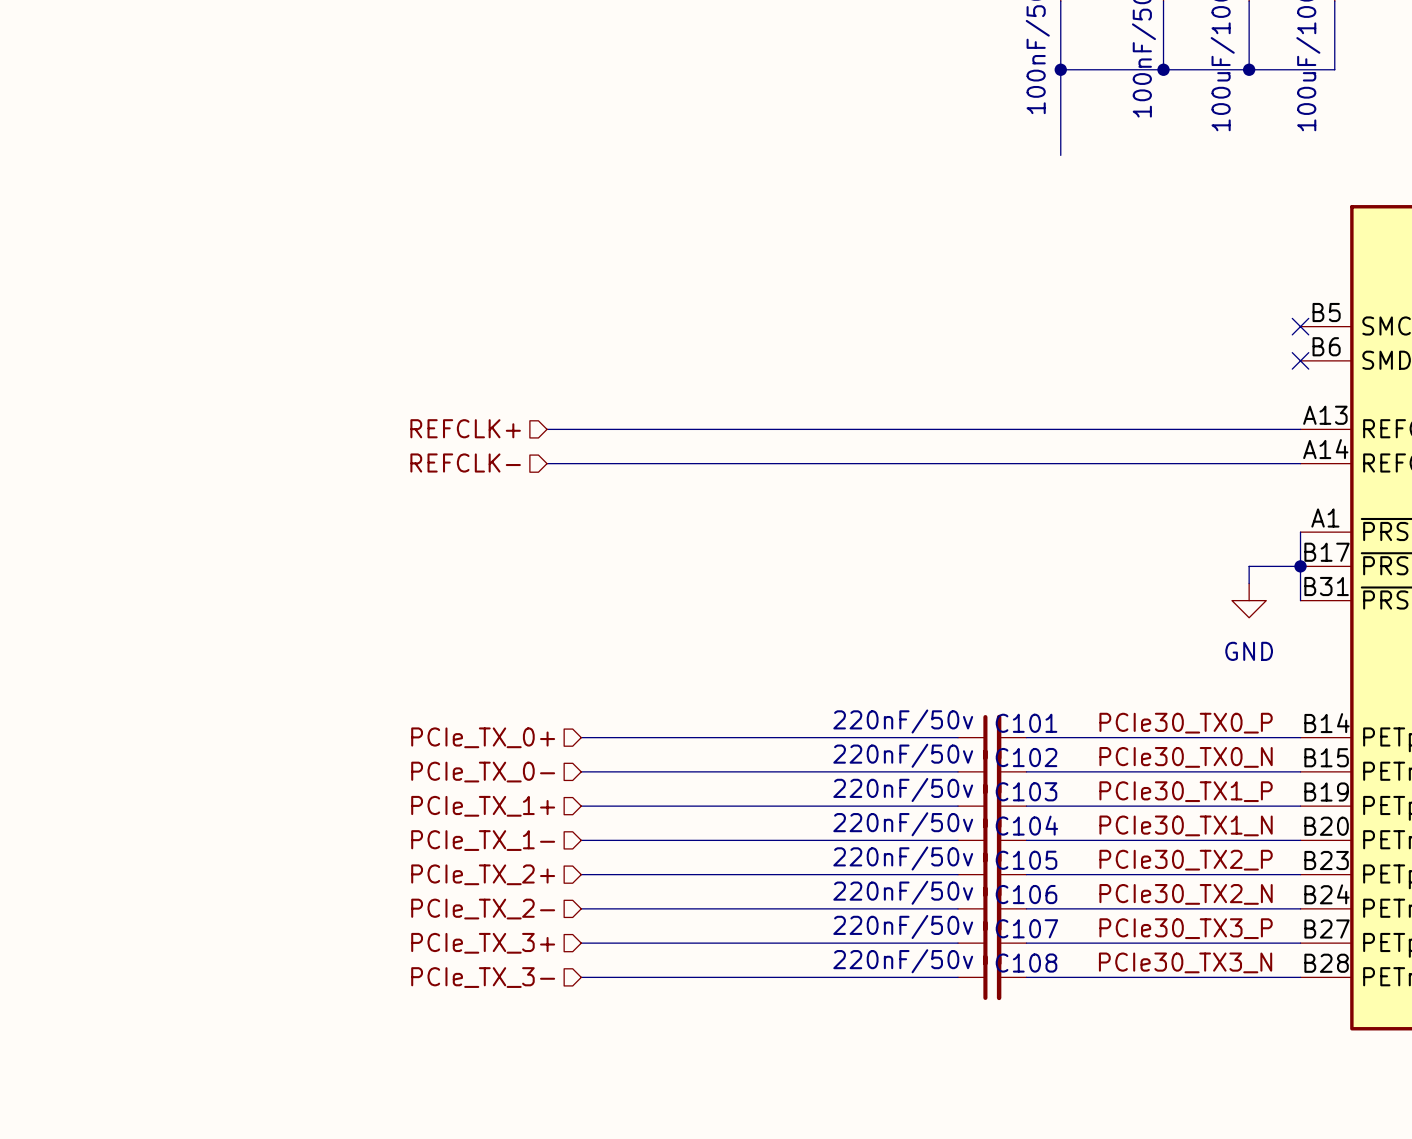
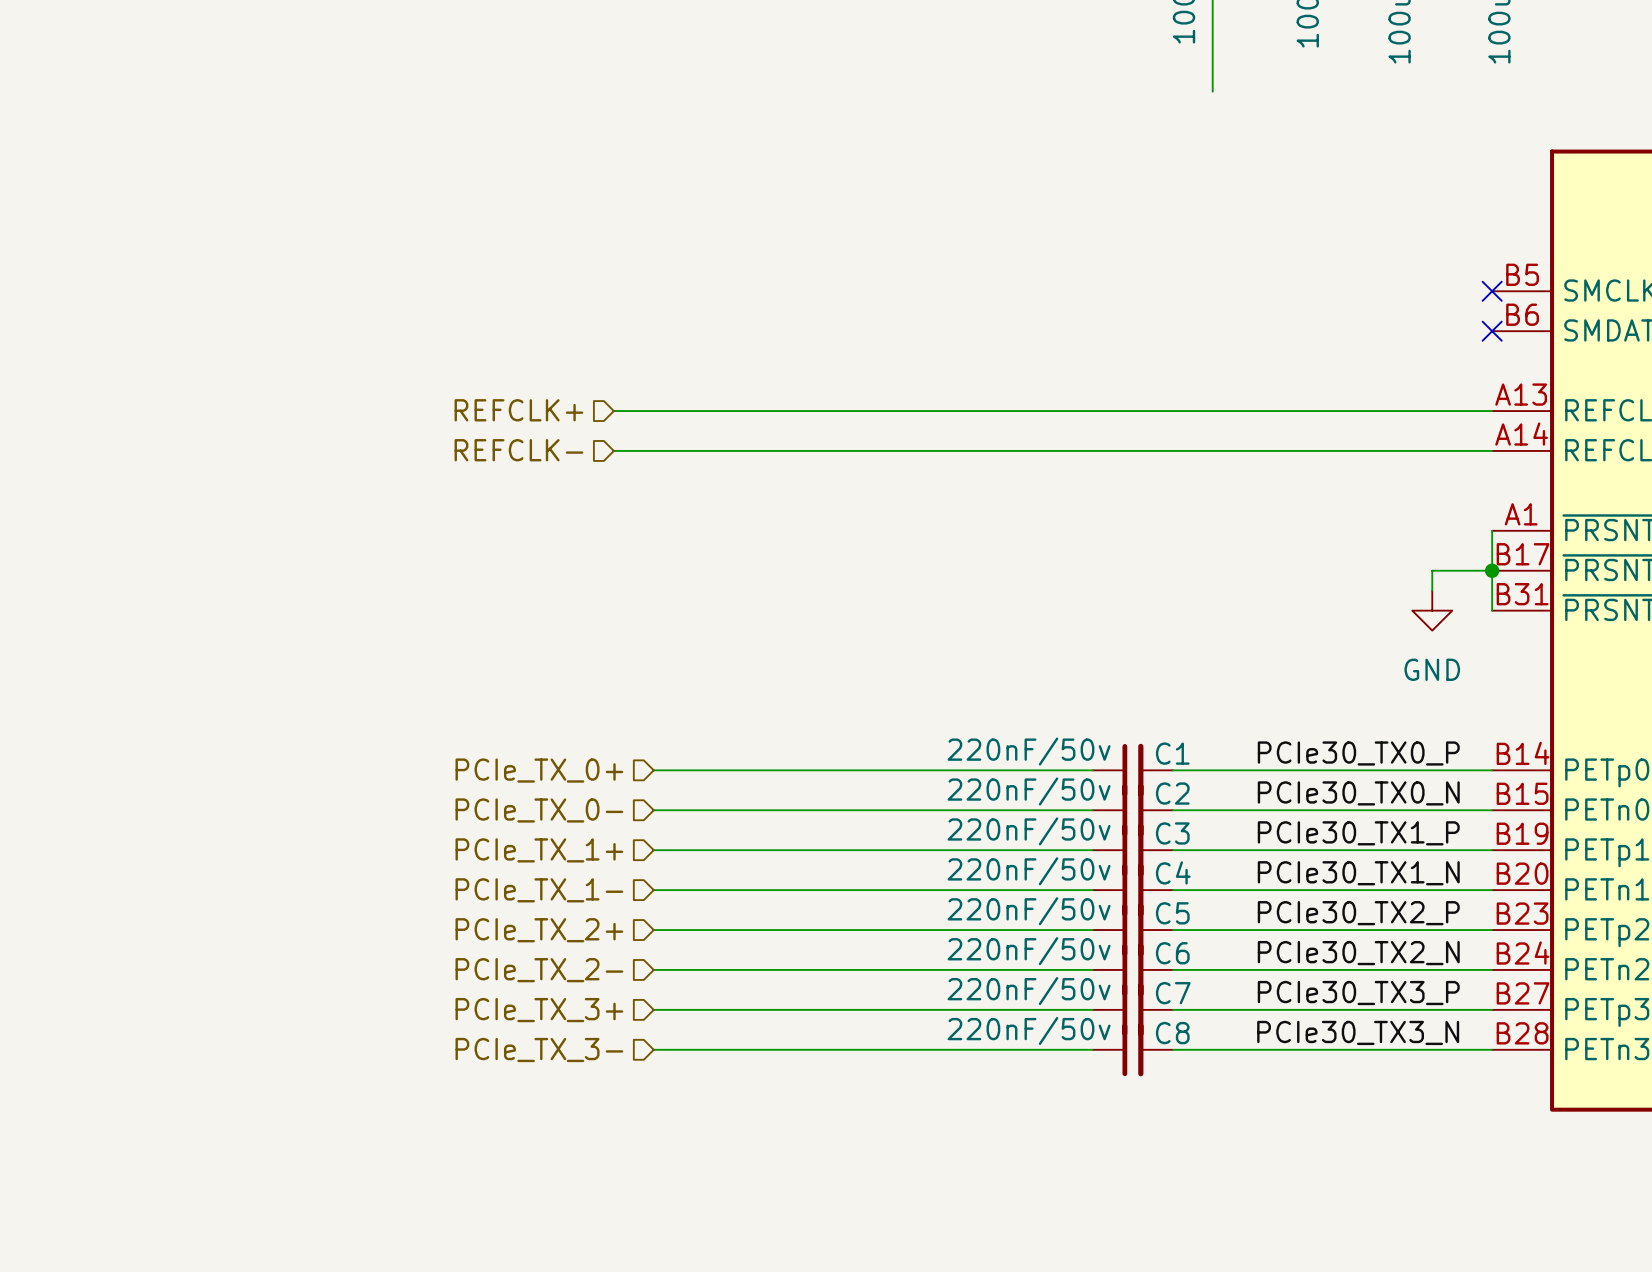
C101 name: C101 (1026, 723) -> C1 (1172, 753)
C102 name: C102 (1026, 757) -> C2 (1172, 793)
C103 name: C103 (1026, 791) -> C3 (1172, 833)
C104 name: C104 (1026, 825) -> C4 (1173, 872)
C105 name: C105 (1026, 860) -> C5 (1172, 913)
C106 name: C106 (1026, 894) -> C6 (1172, 953)
C107 name: C107 (1026, 928) -> C7 (1173, 993)
C108 name: C108 (1026, 963) -> C8 (1172, 1033)

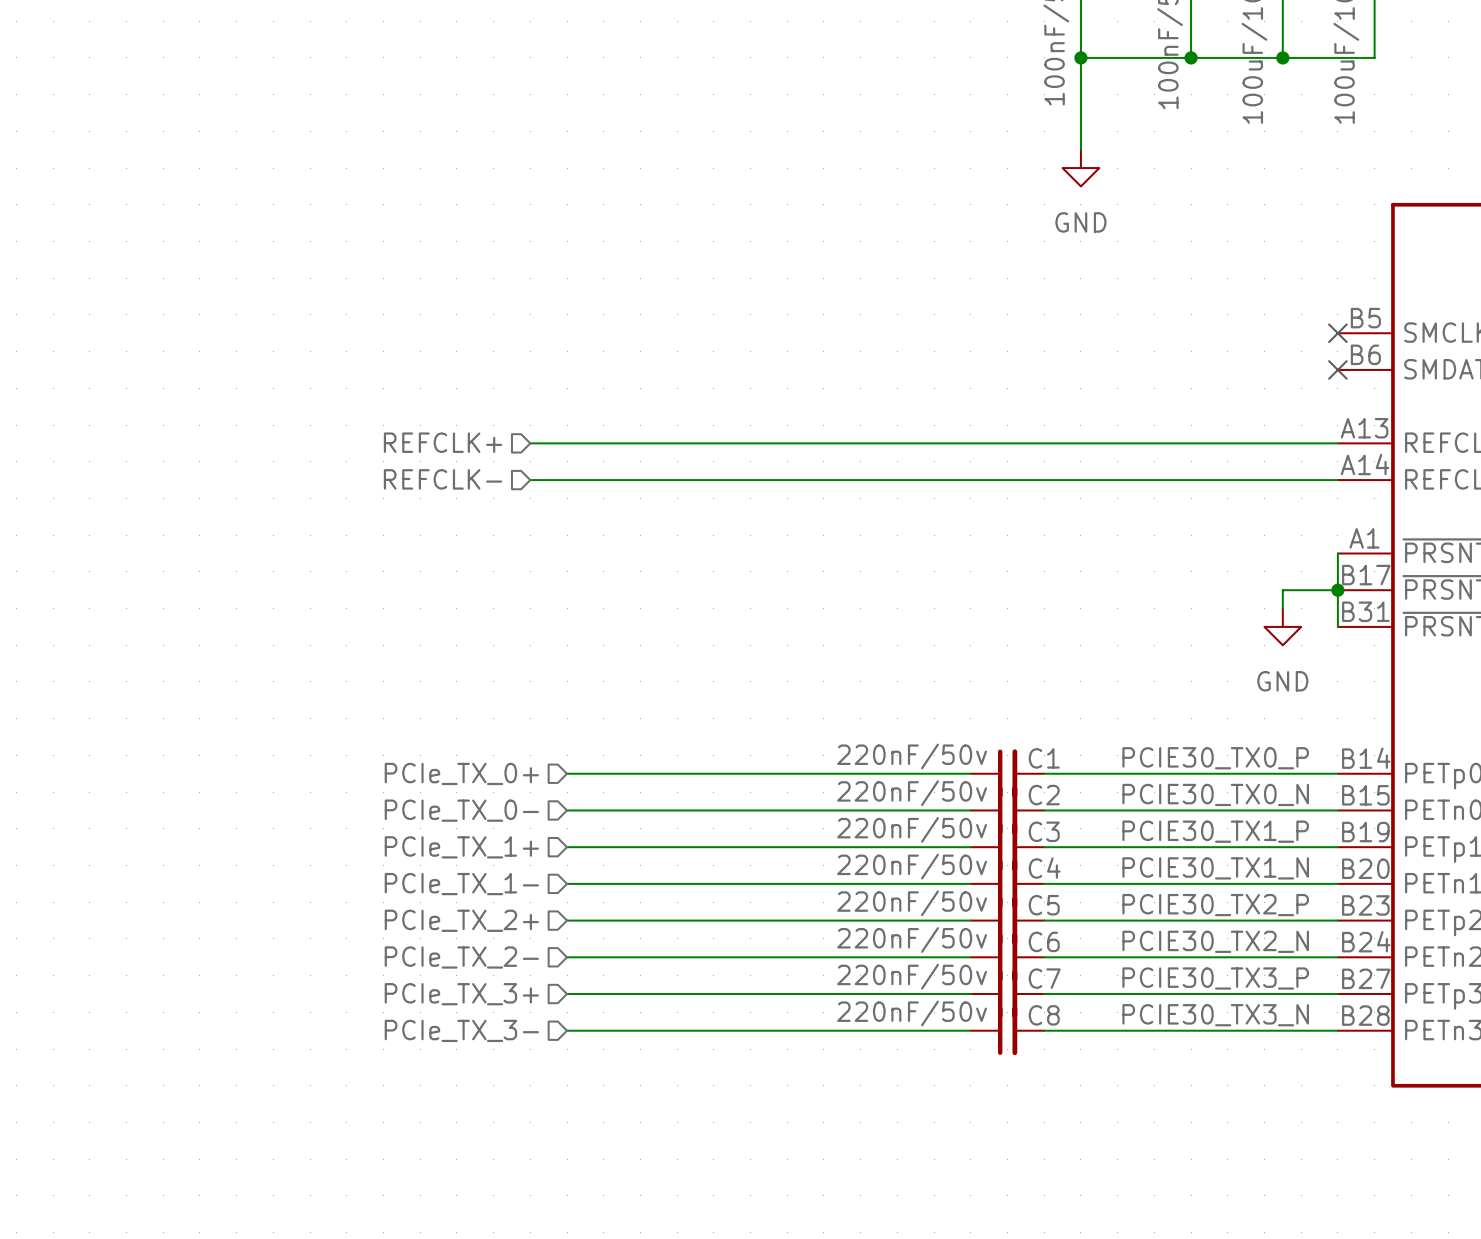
power symbol: none -> GND (1080, 168)
label: PCIe30_TX0_P (1358, 753) -> PCIE30_TX0_P (1215, 758)
label: PCIe30_TX0_N (1358, 793) -> PCIE30_TX0_N (1215, 794)
label: PCIe30_TX1_P (1358, 833) -> PCIE30_TX1_P (1215, 831)
label: PCIe30_TX1_N (1358, 873) -> PCIE30_TX1_N (1215, 868)
label: PCIe30_TX2_P (1358, 913) -> PCIE30_TX2_P (1215, 905)
label: PCIe30_TX2_N (1358, 953) -> PCIE30_TX2_N (1215, 941)
label: PCIe30_TX3_P (1358, 993) -> PCIE30_TX3_P (1215, 978)
label: PCIe30_TX3_N (1358, 1032) -> PCIE30_TX3_N (1215, 1015)

